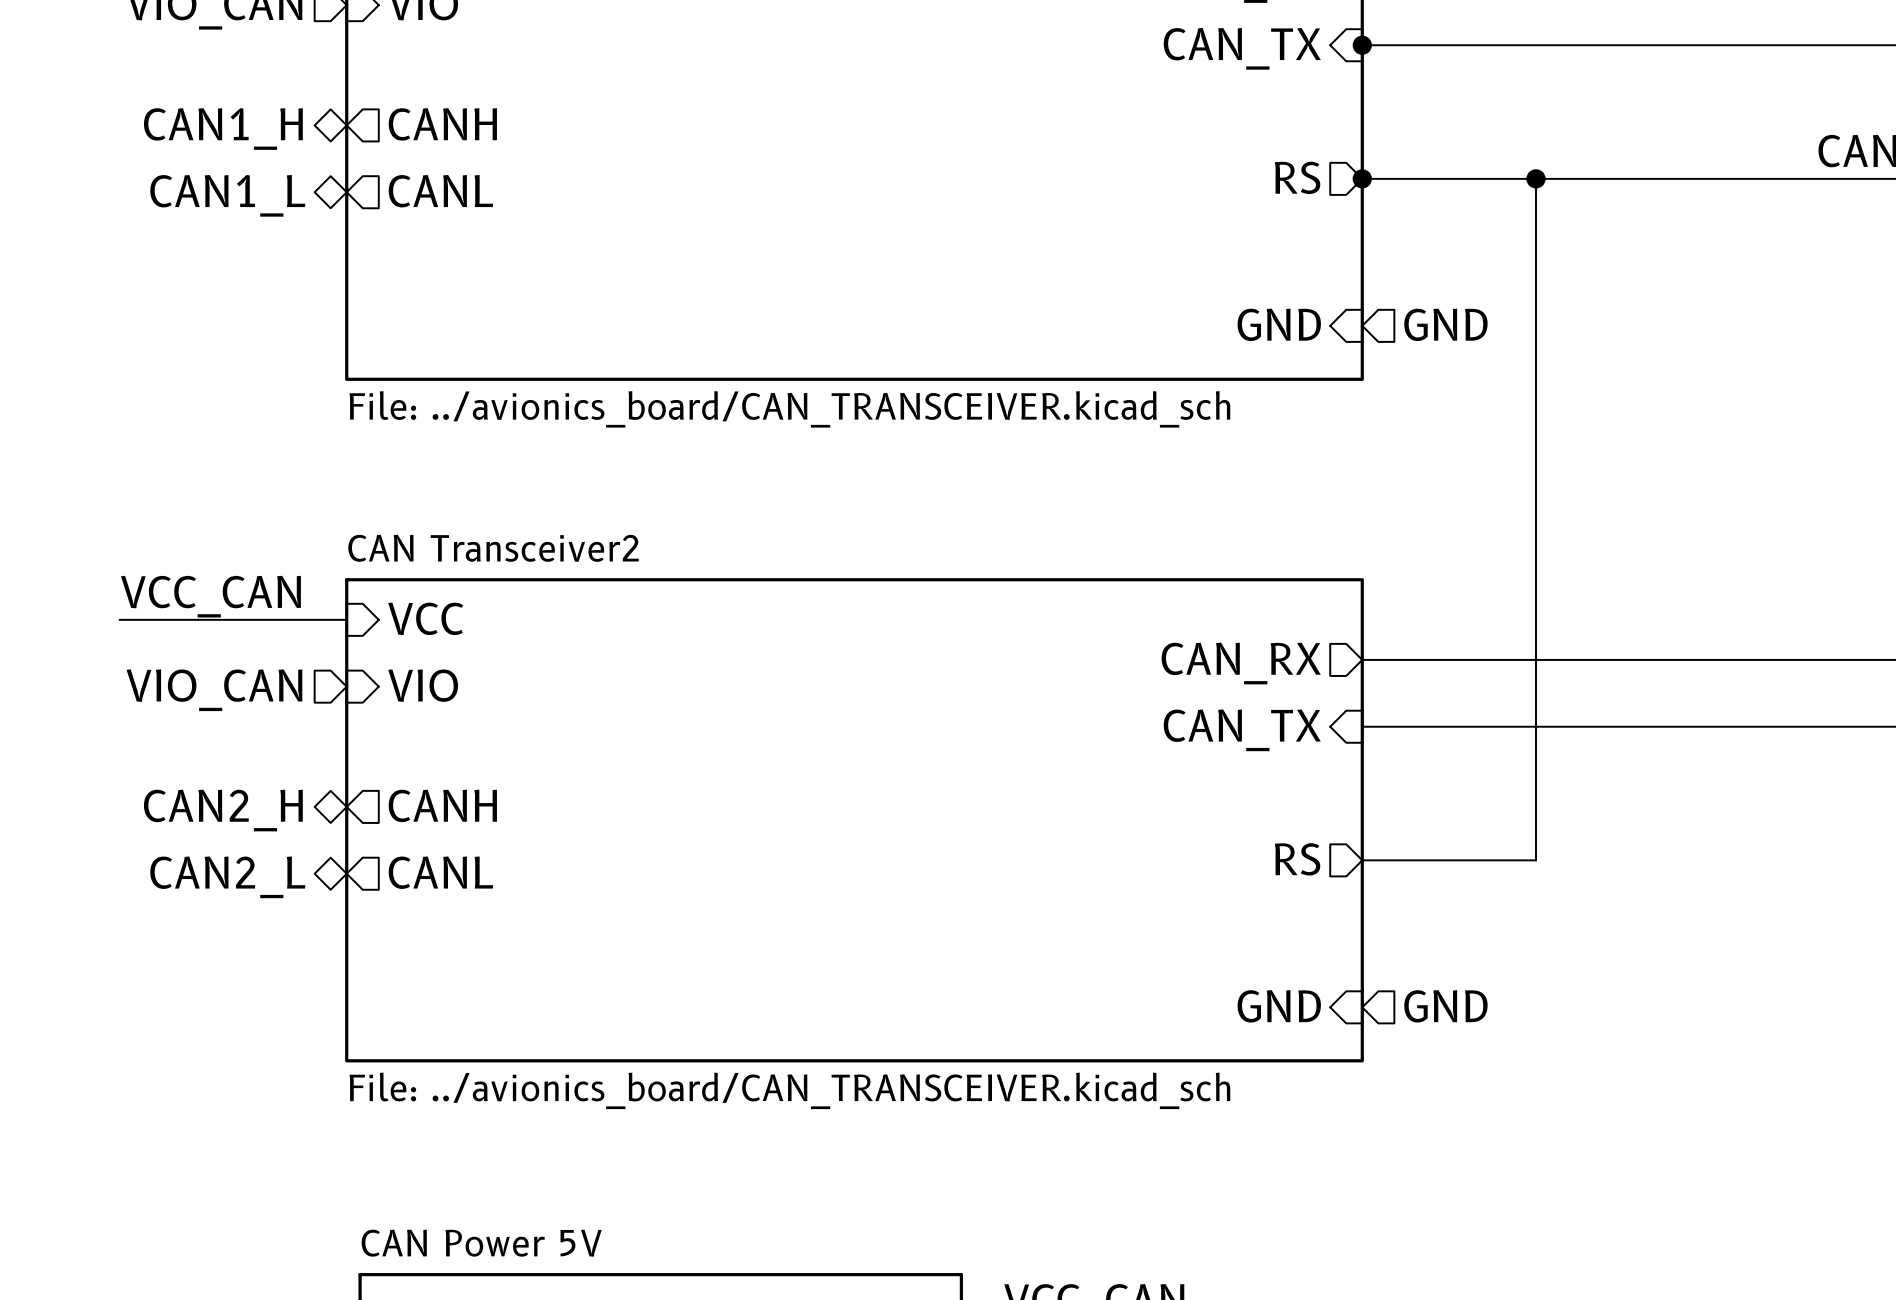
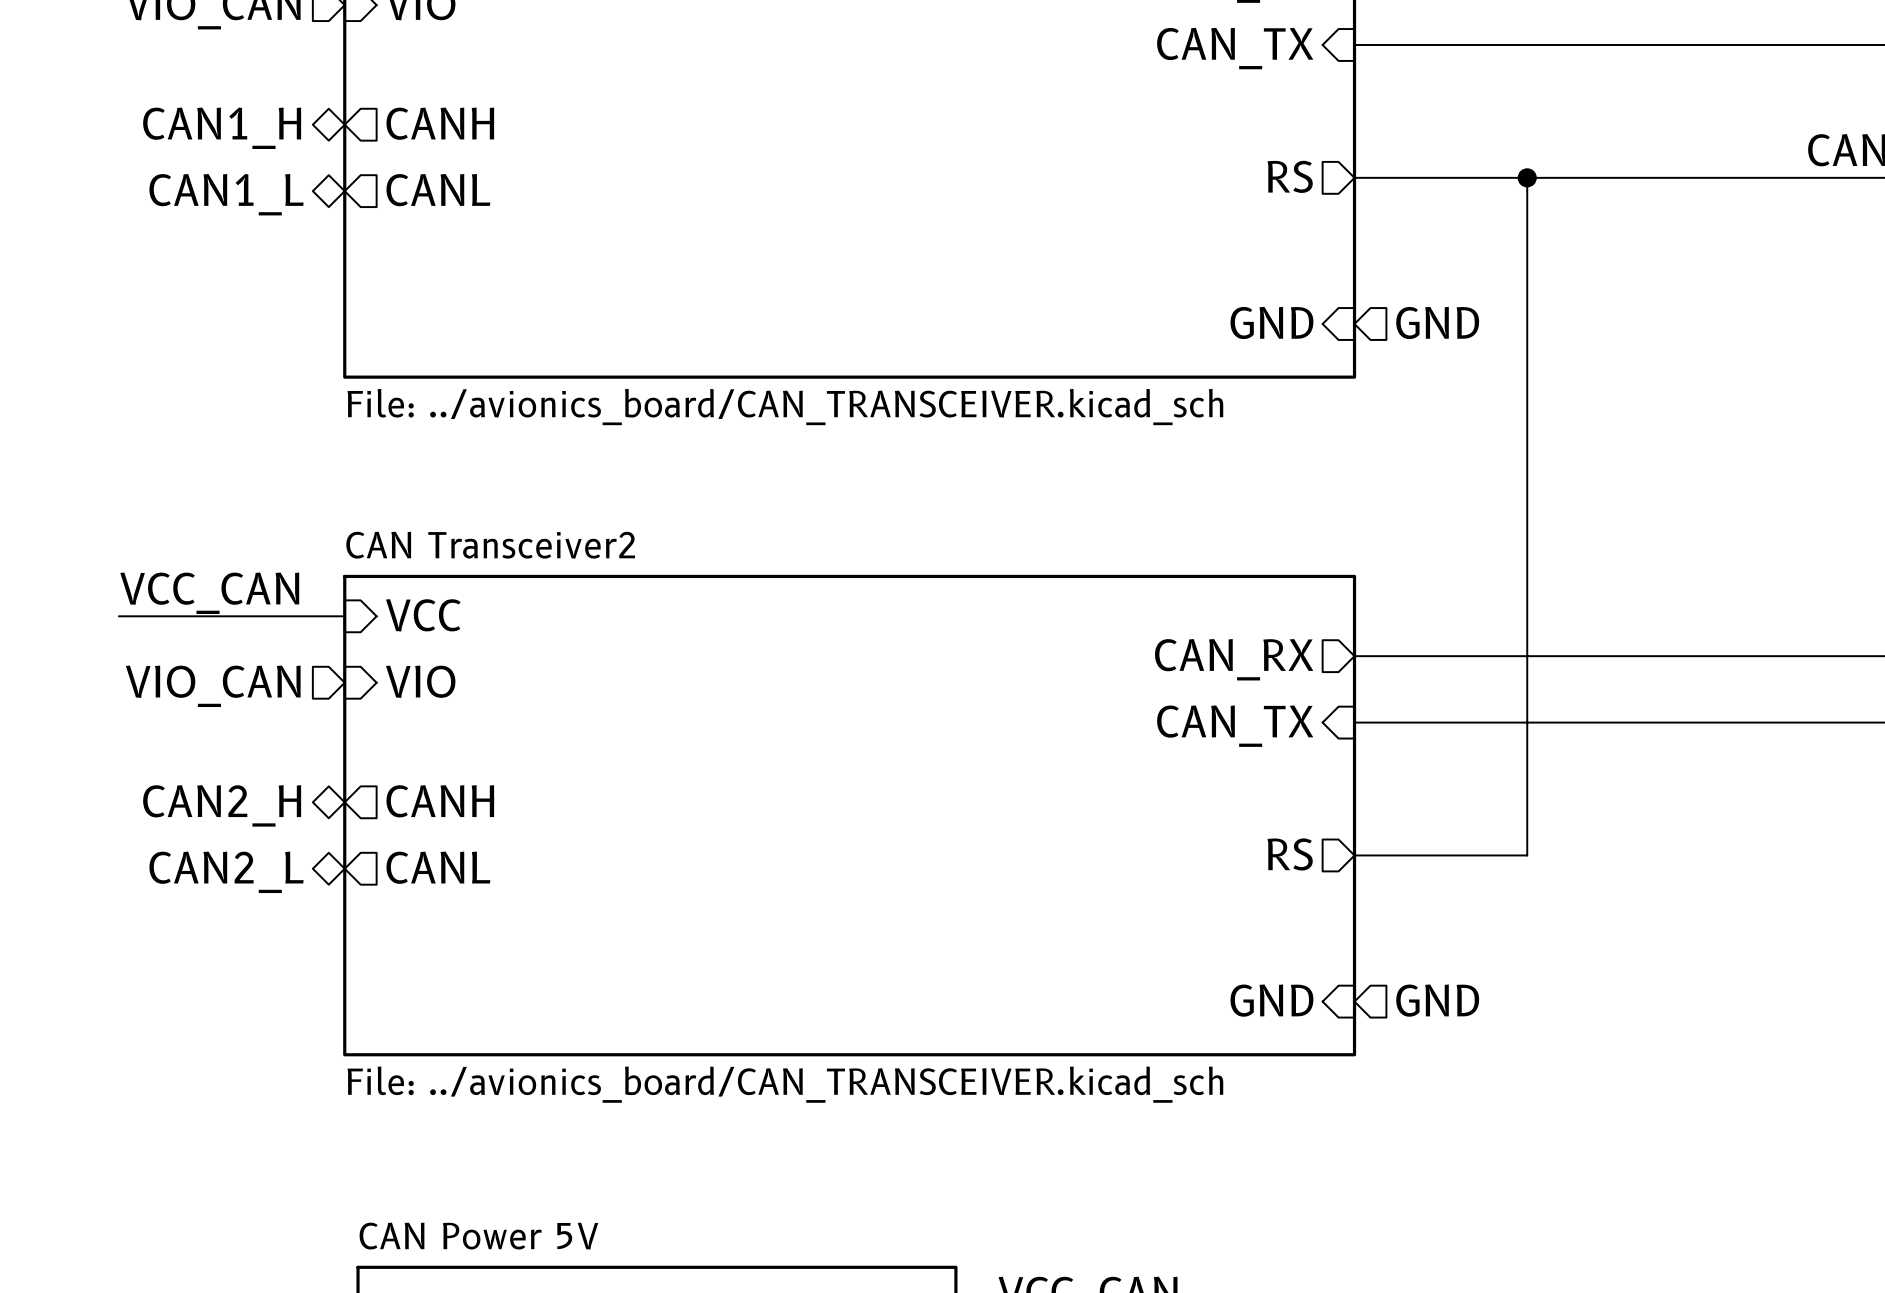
junction: (1362, 45) -> none
junction: (1362, 178) -> none

